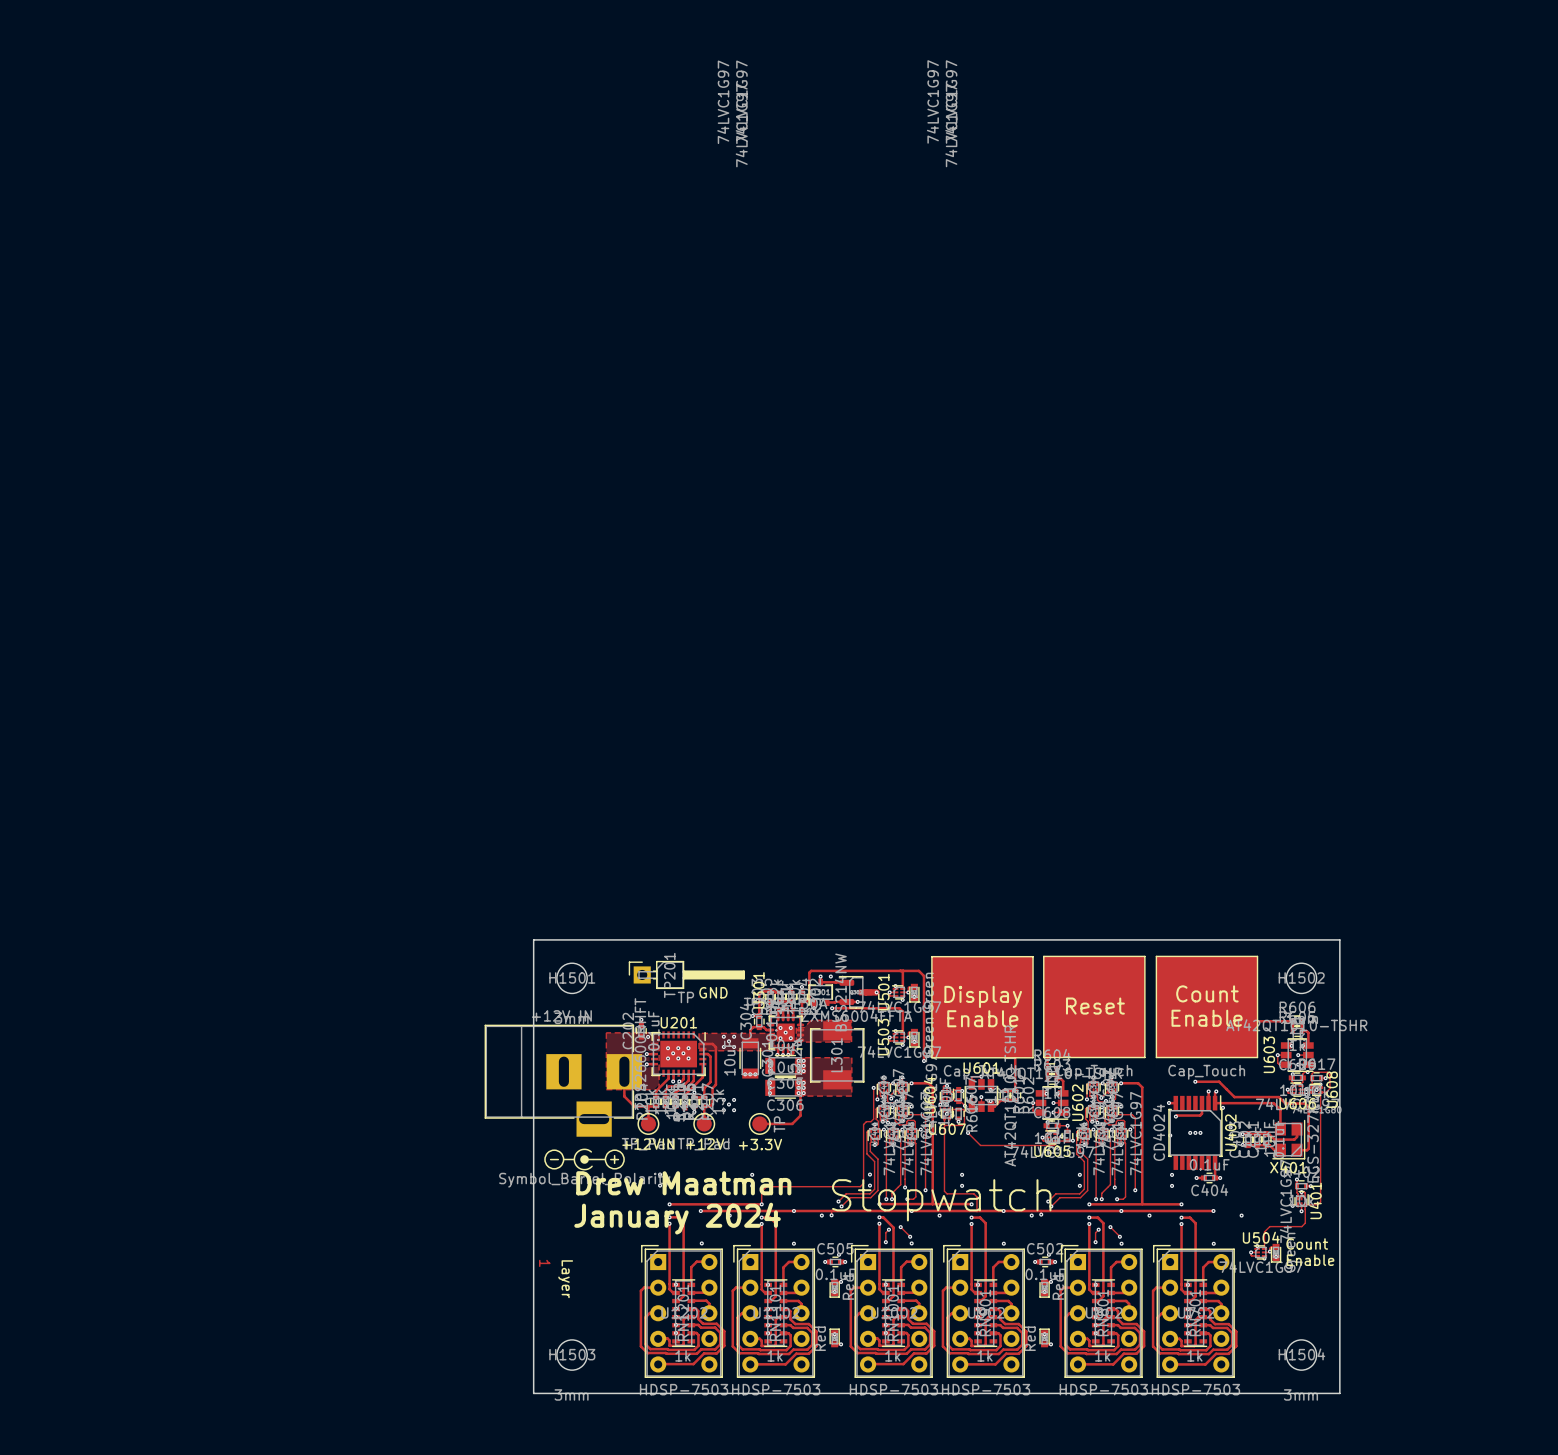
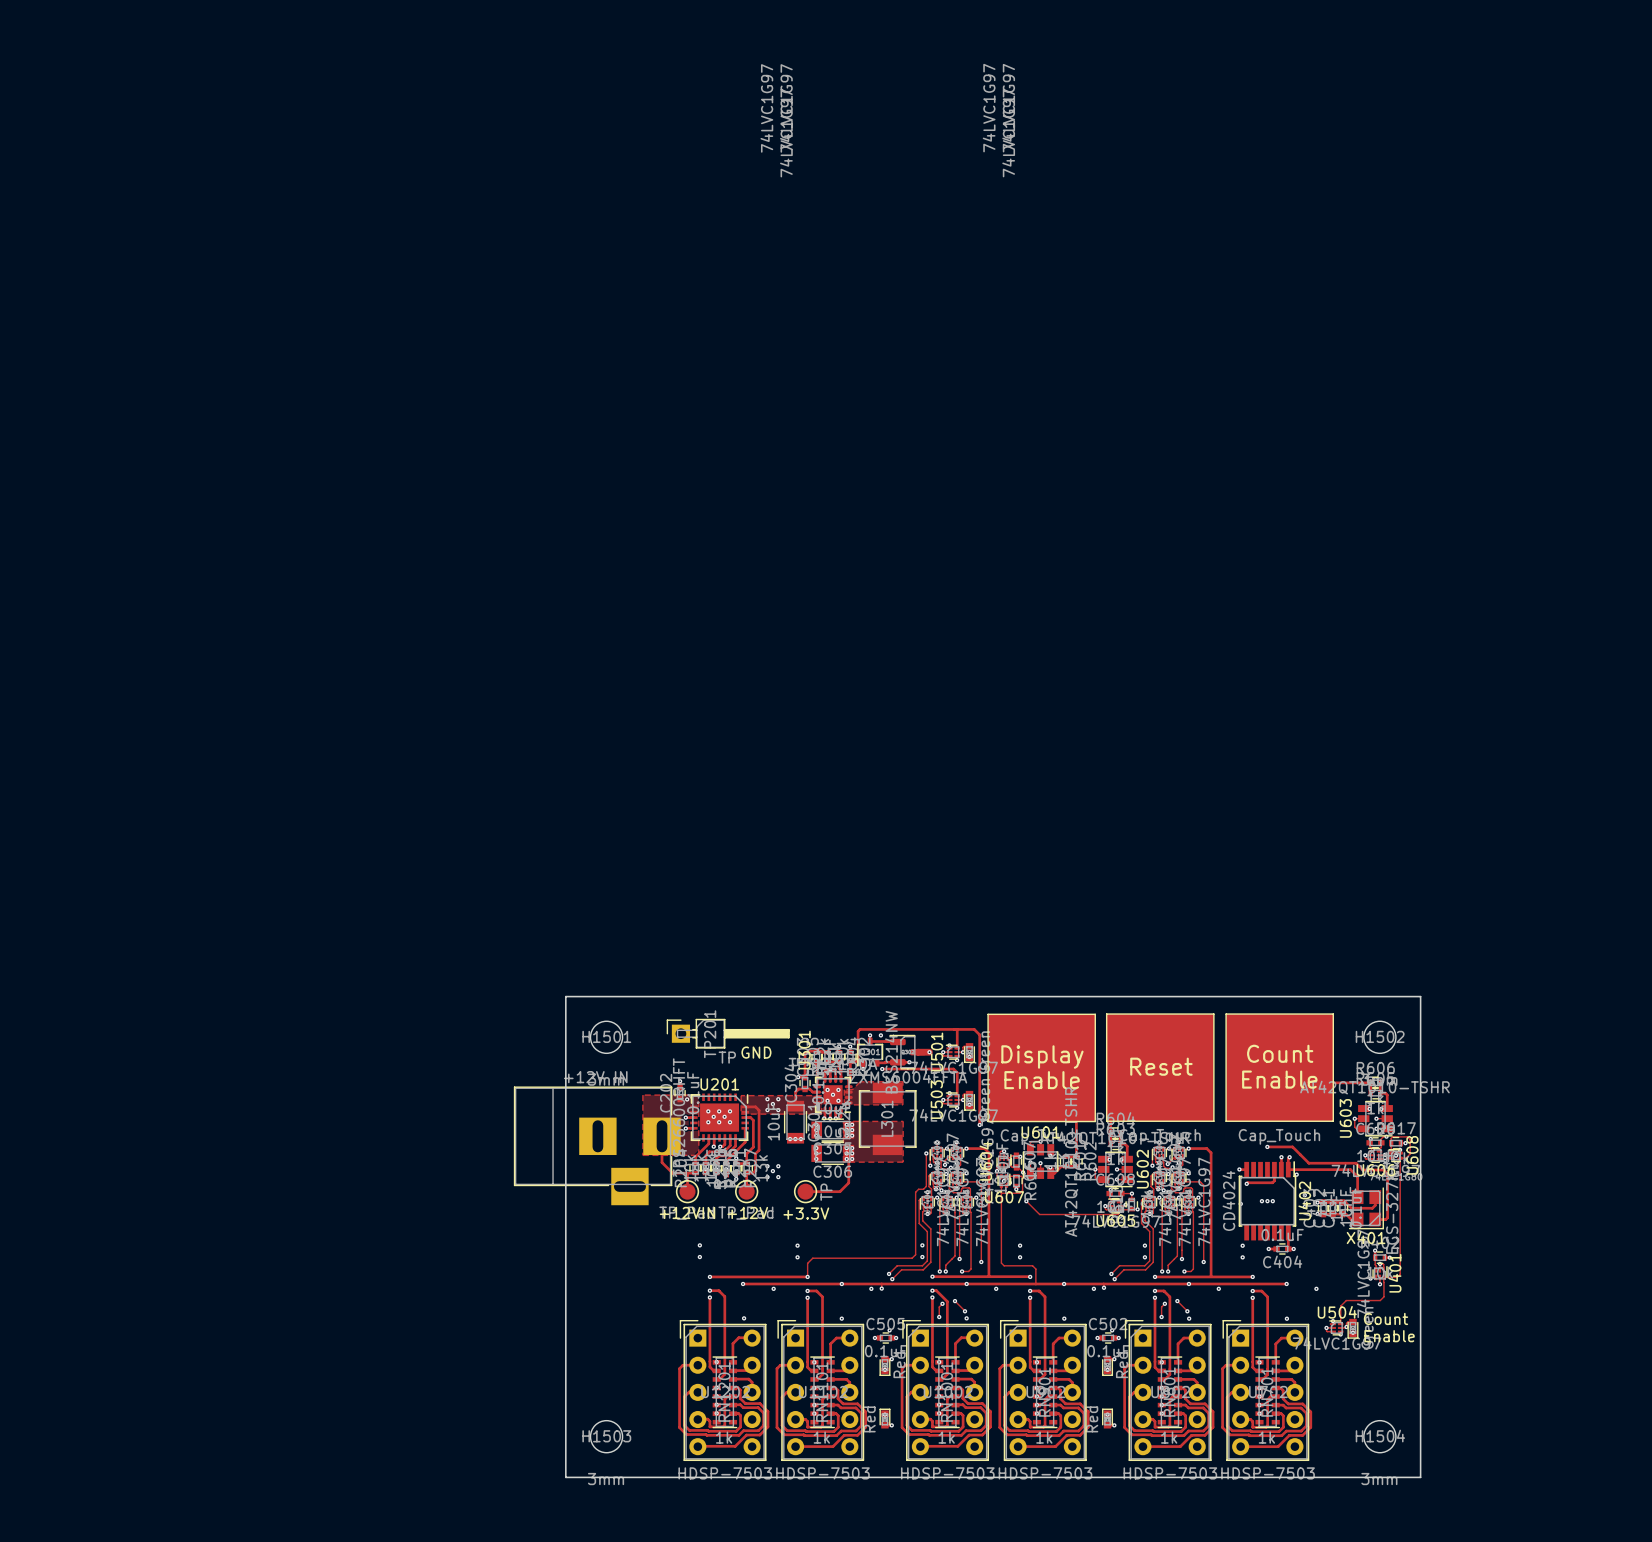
drawing: [544, 1148, 625, 1171] -> none
text: - (554, 1159) -> none
text: + (614, 1159) -> none
text: Drew Maatman (683, 1183) -> none
text: Stopwatch (941, 1200) -> none
text: January 2024 (677, 1218) -> none
text: 1 (544, 1263) -> none
text: Layer (565, 1279) -> none

